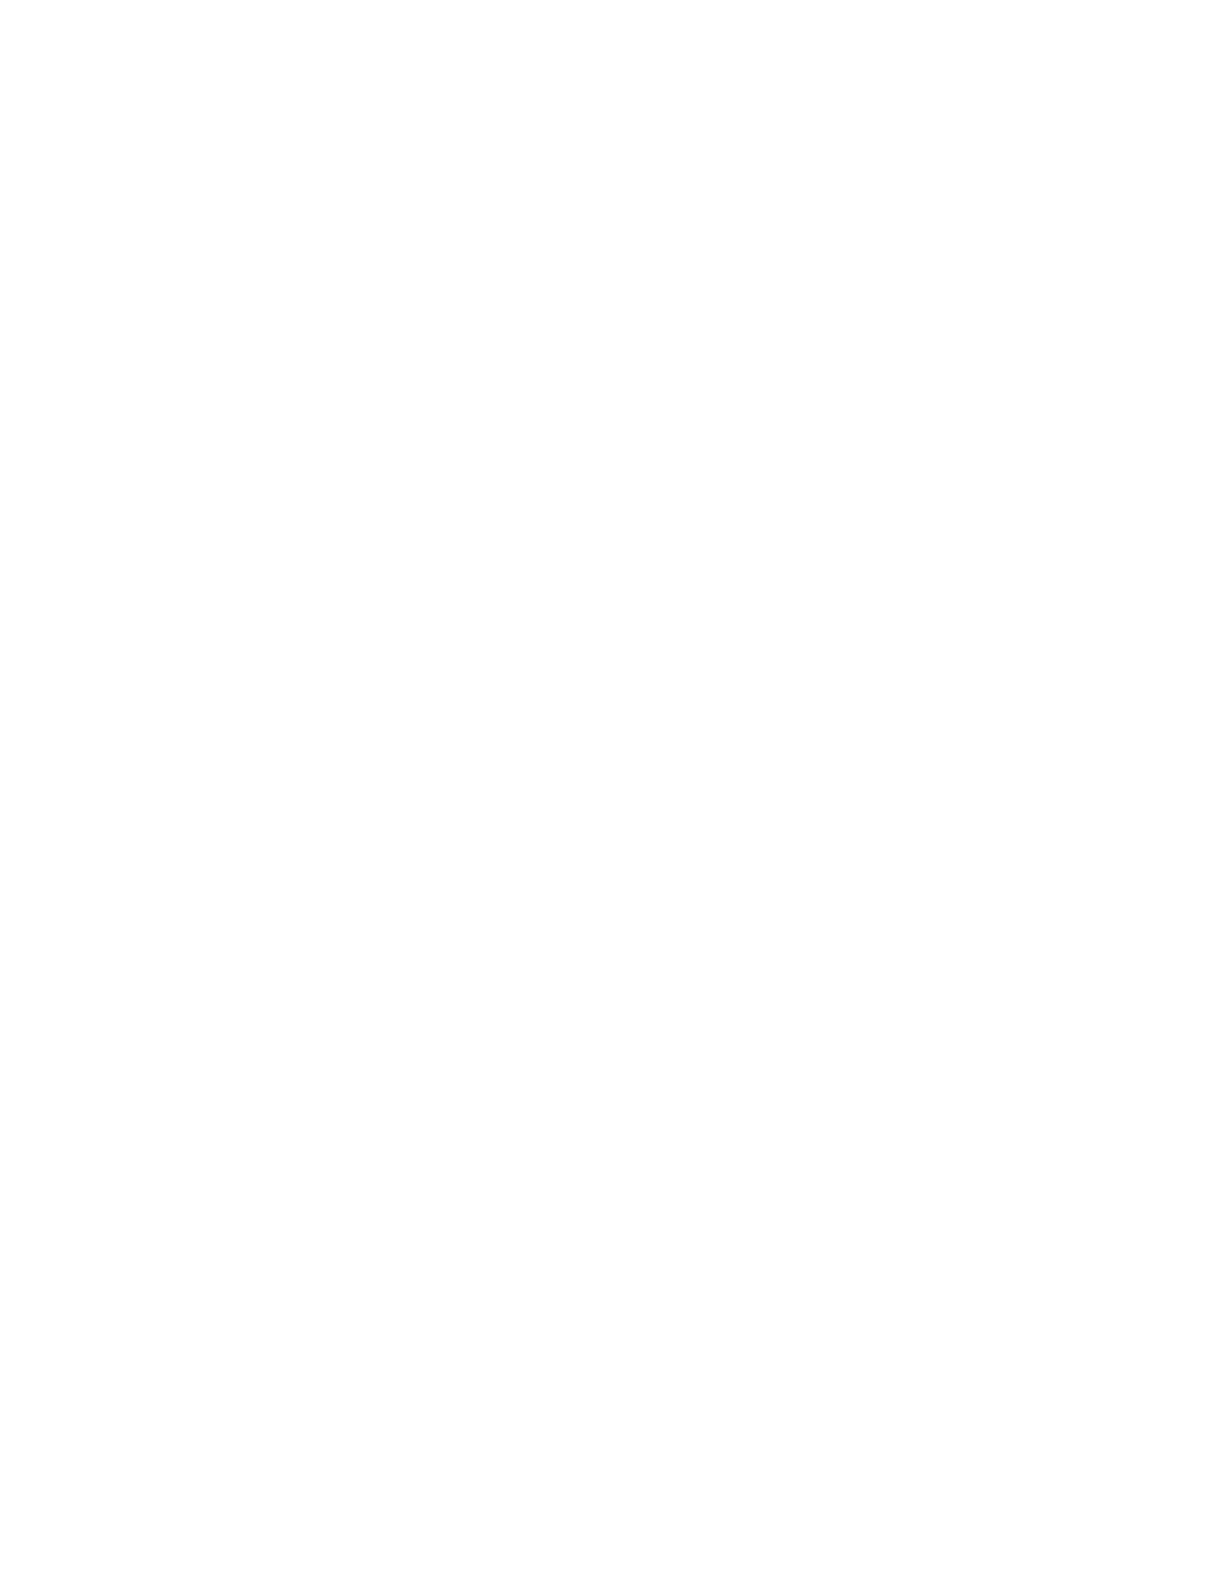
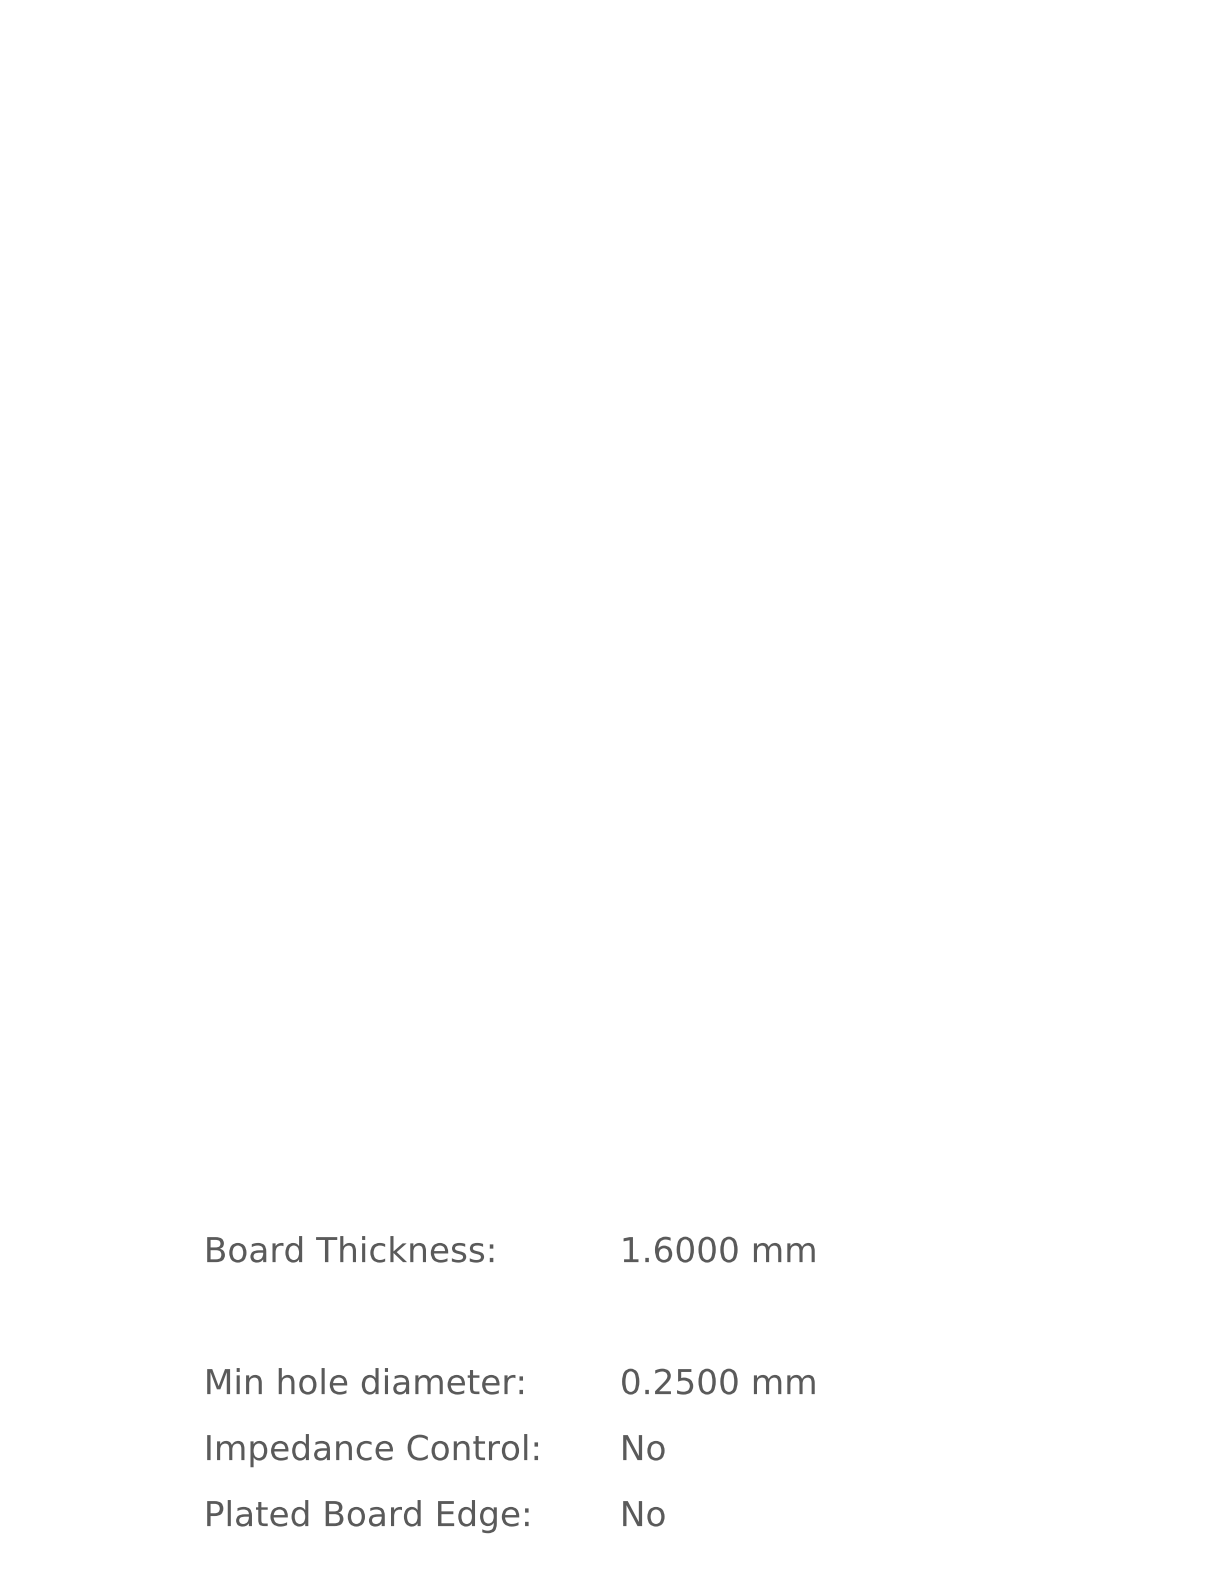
text: none -> Board Thickness: (350, 1249)
text: none -> 1.6000 mm (719, 1249)
text: none -> Min hole diameter: (365, 1381)
text: none -> 0.2500 mm (718, 1381)
text: none -> No (643, 1447)
text: none -> Impedance Control: (372, 1450)
text: none -> No (643, 1513)
text: none -> Plated Board Edge: (367, 1516)

